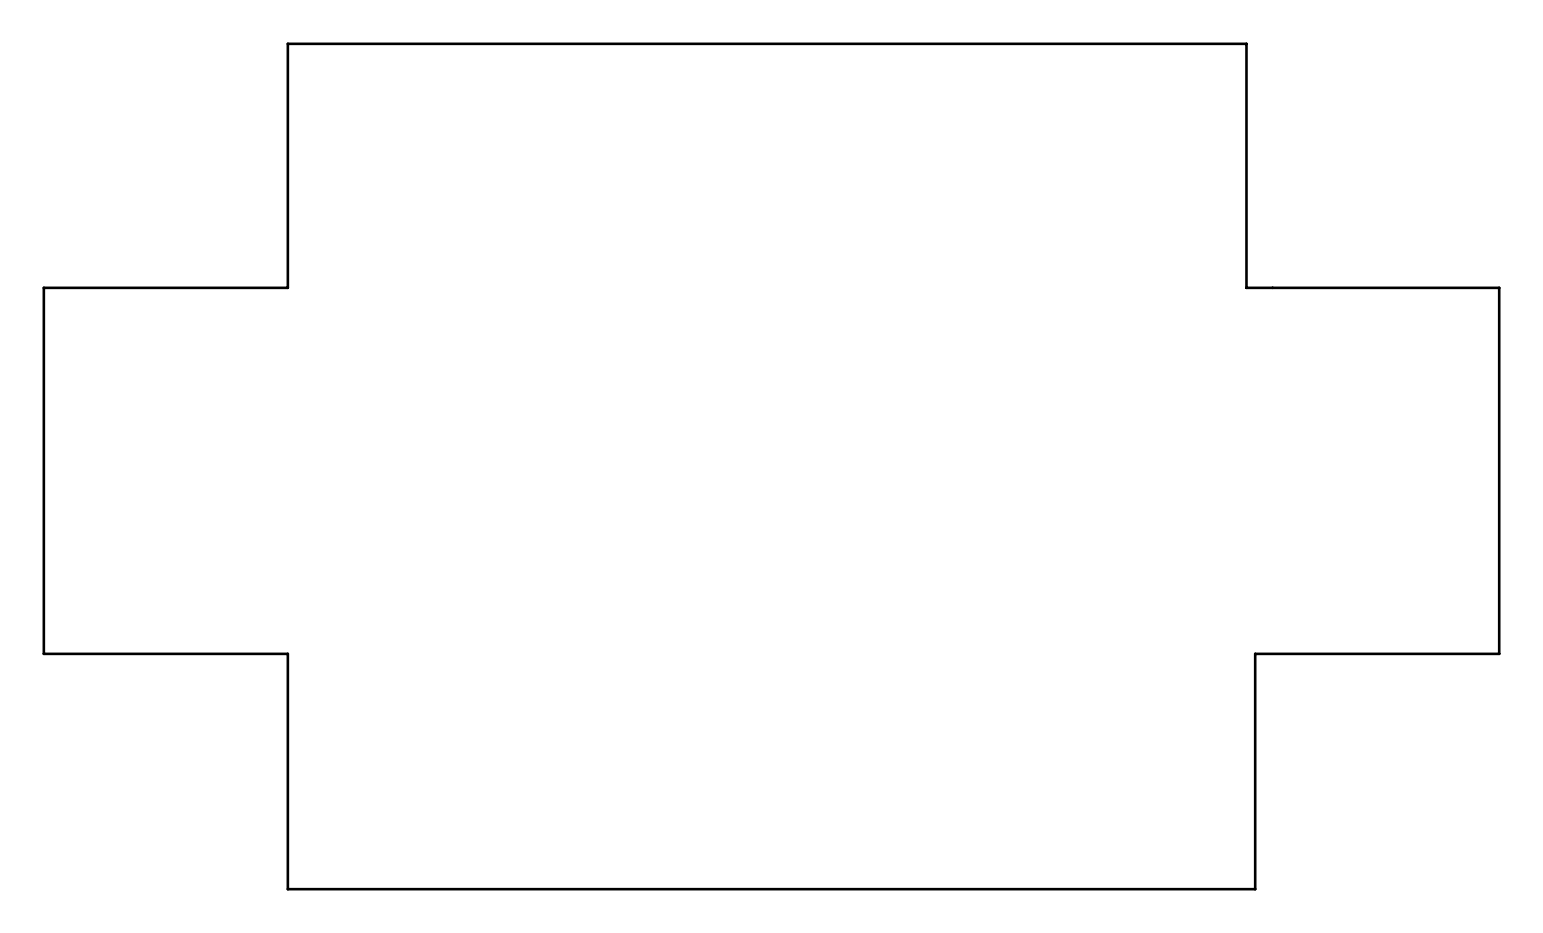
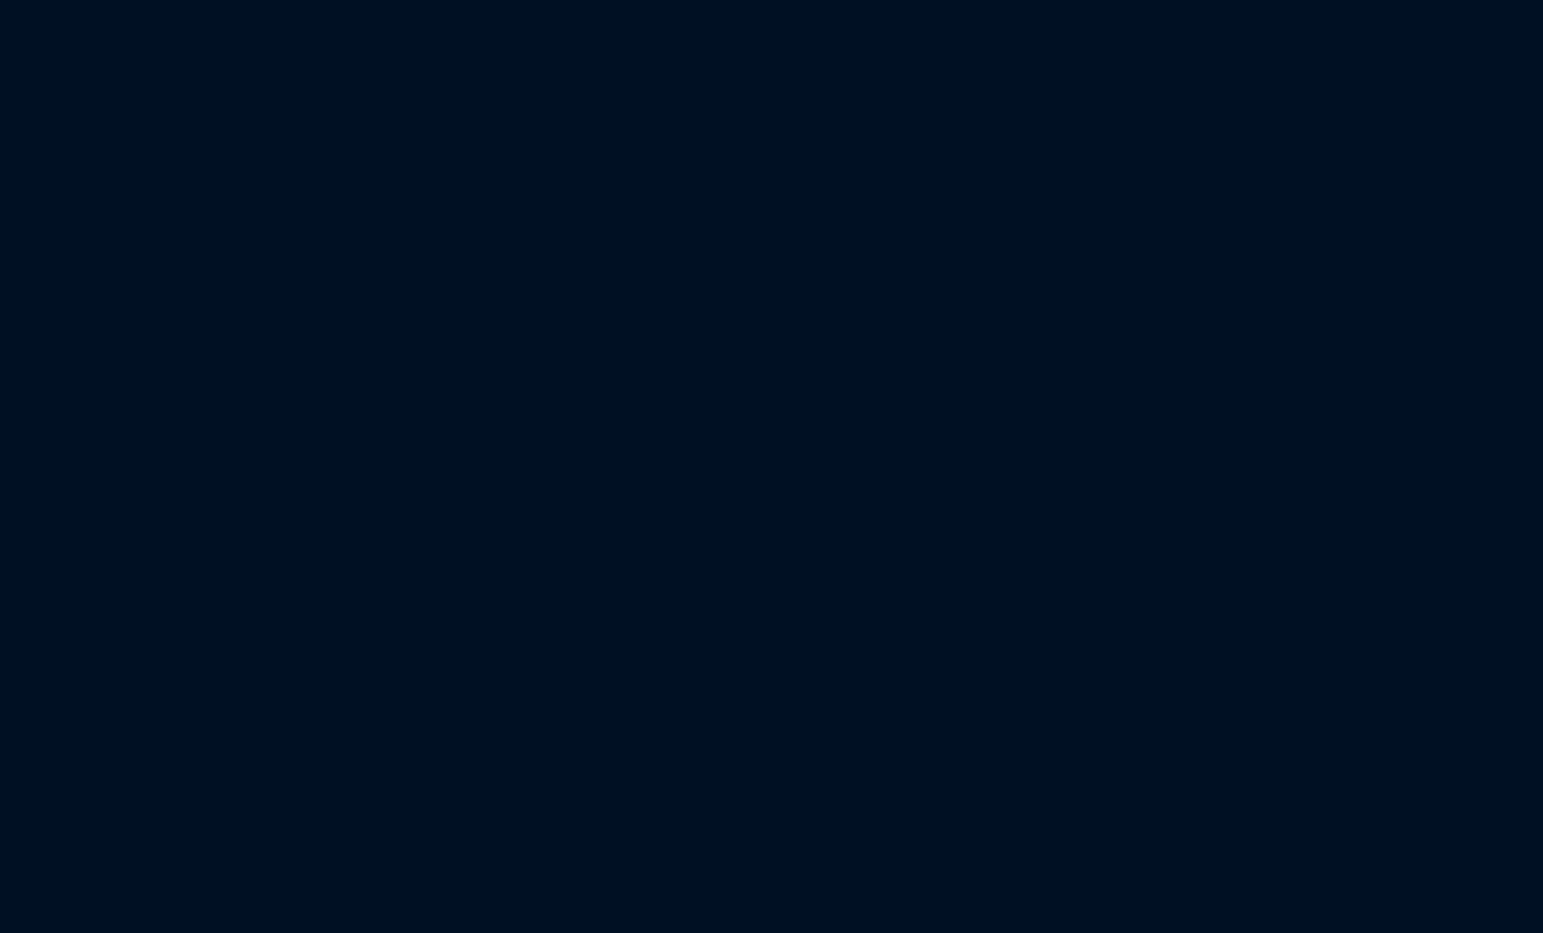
board edge: (287, 43) (1246, 43) (1246, 287) (1499, 287) (1499, 653) (1255, 653) (1255, 889) (287, 889) (287, 653) (43, 653) (43, 287) (287, 287) (287, 43) -> none

